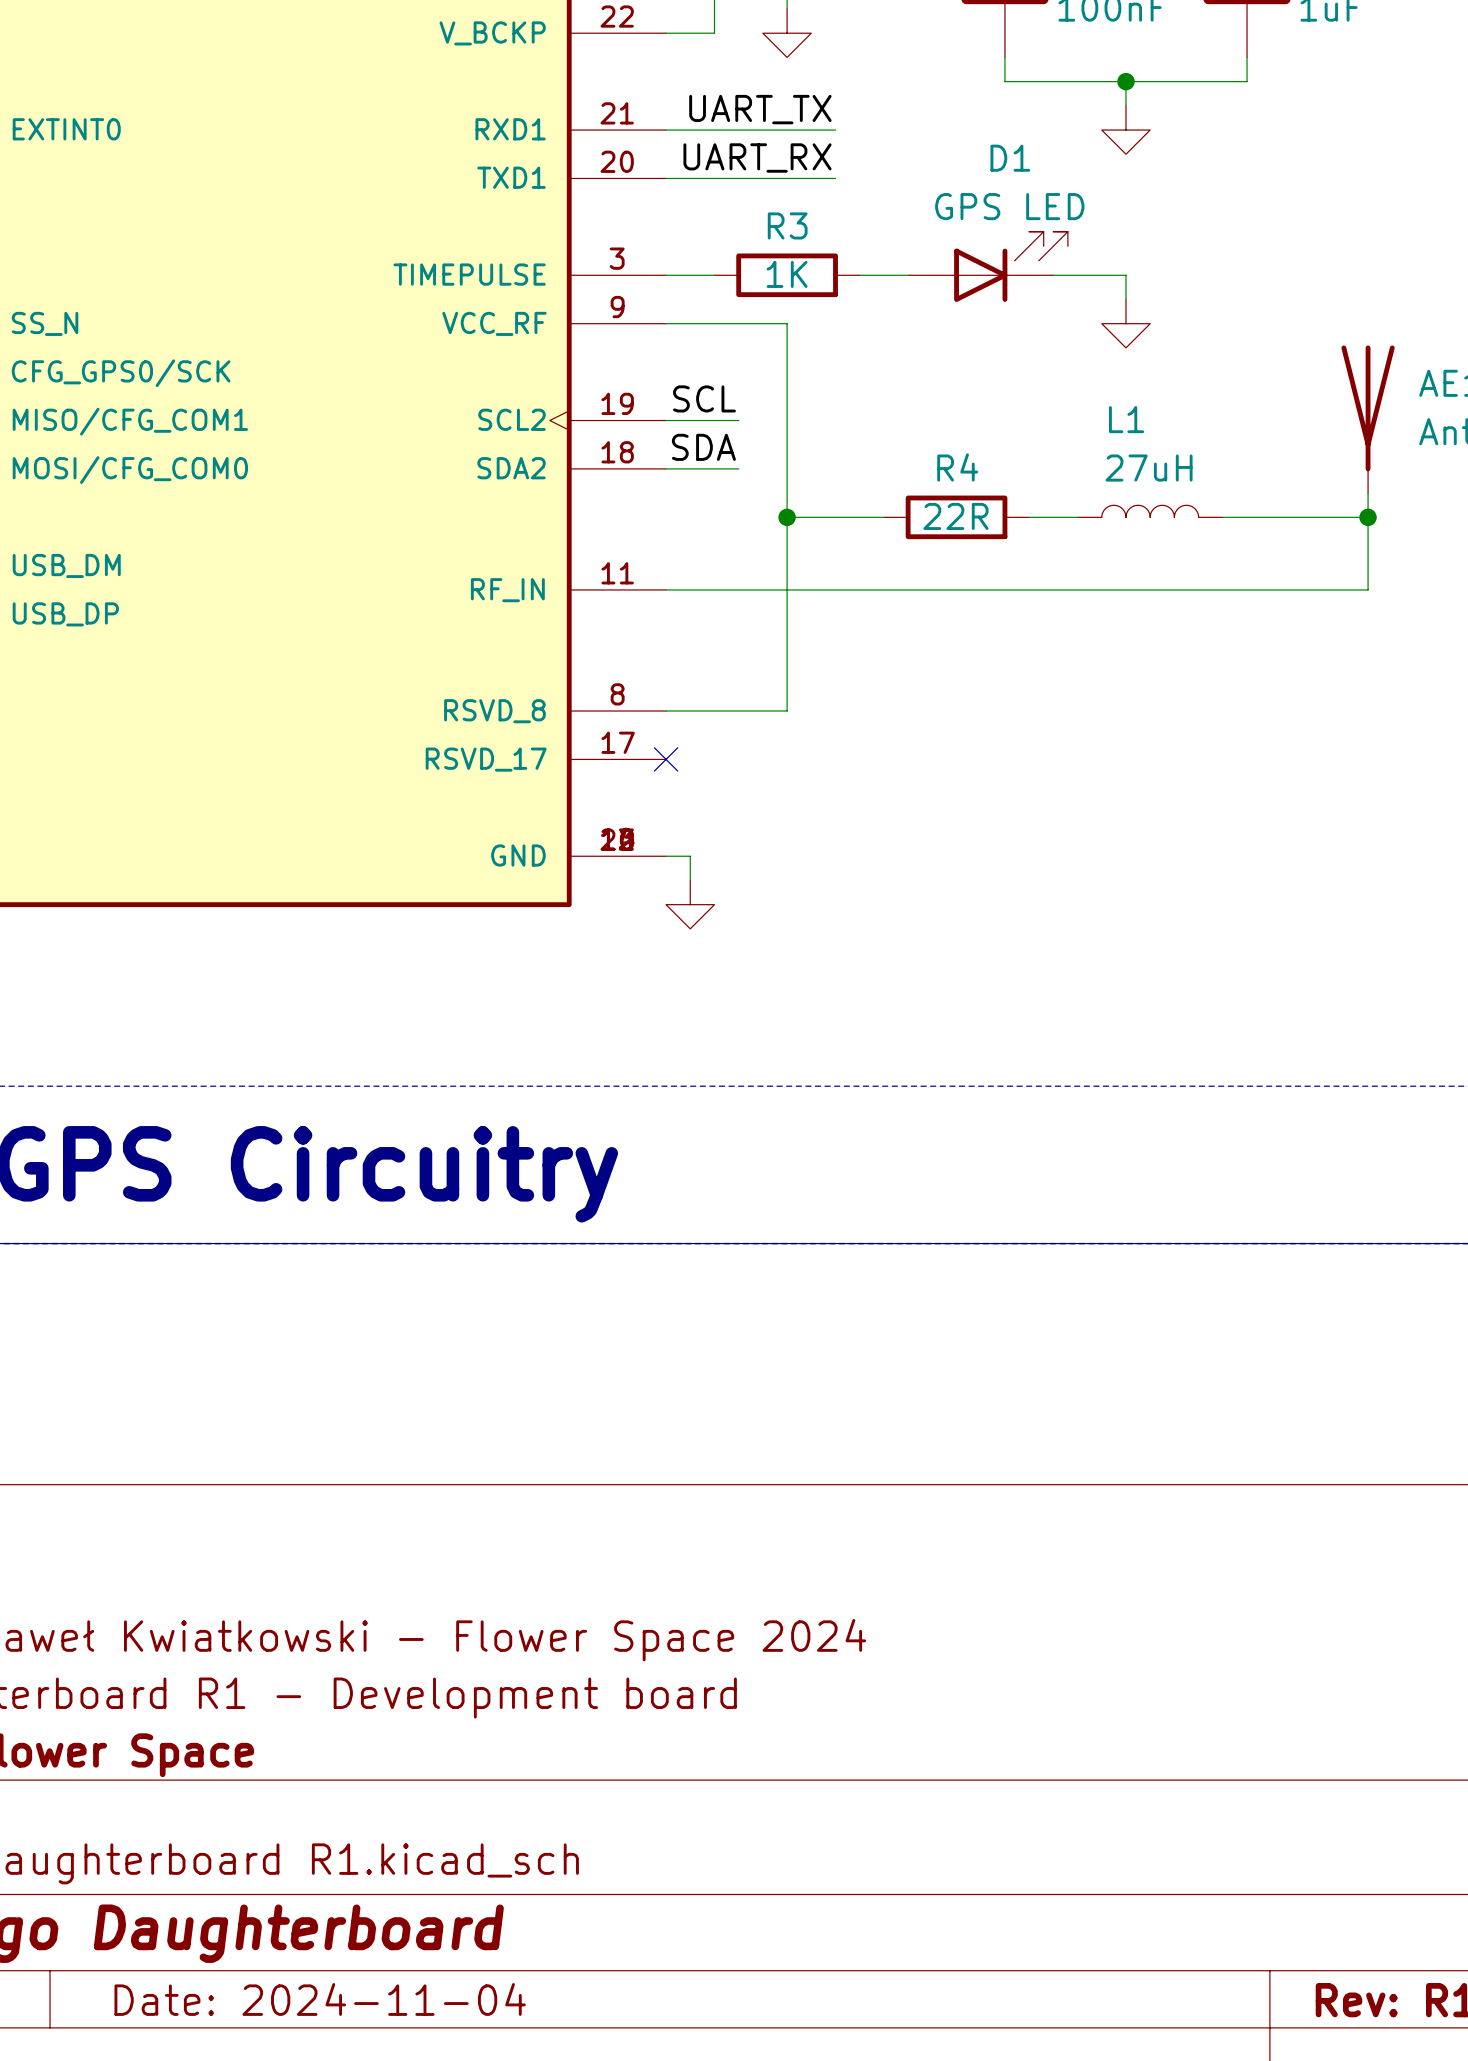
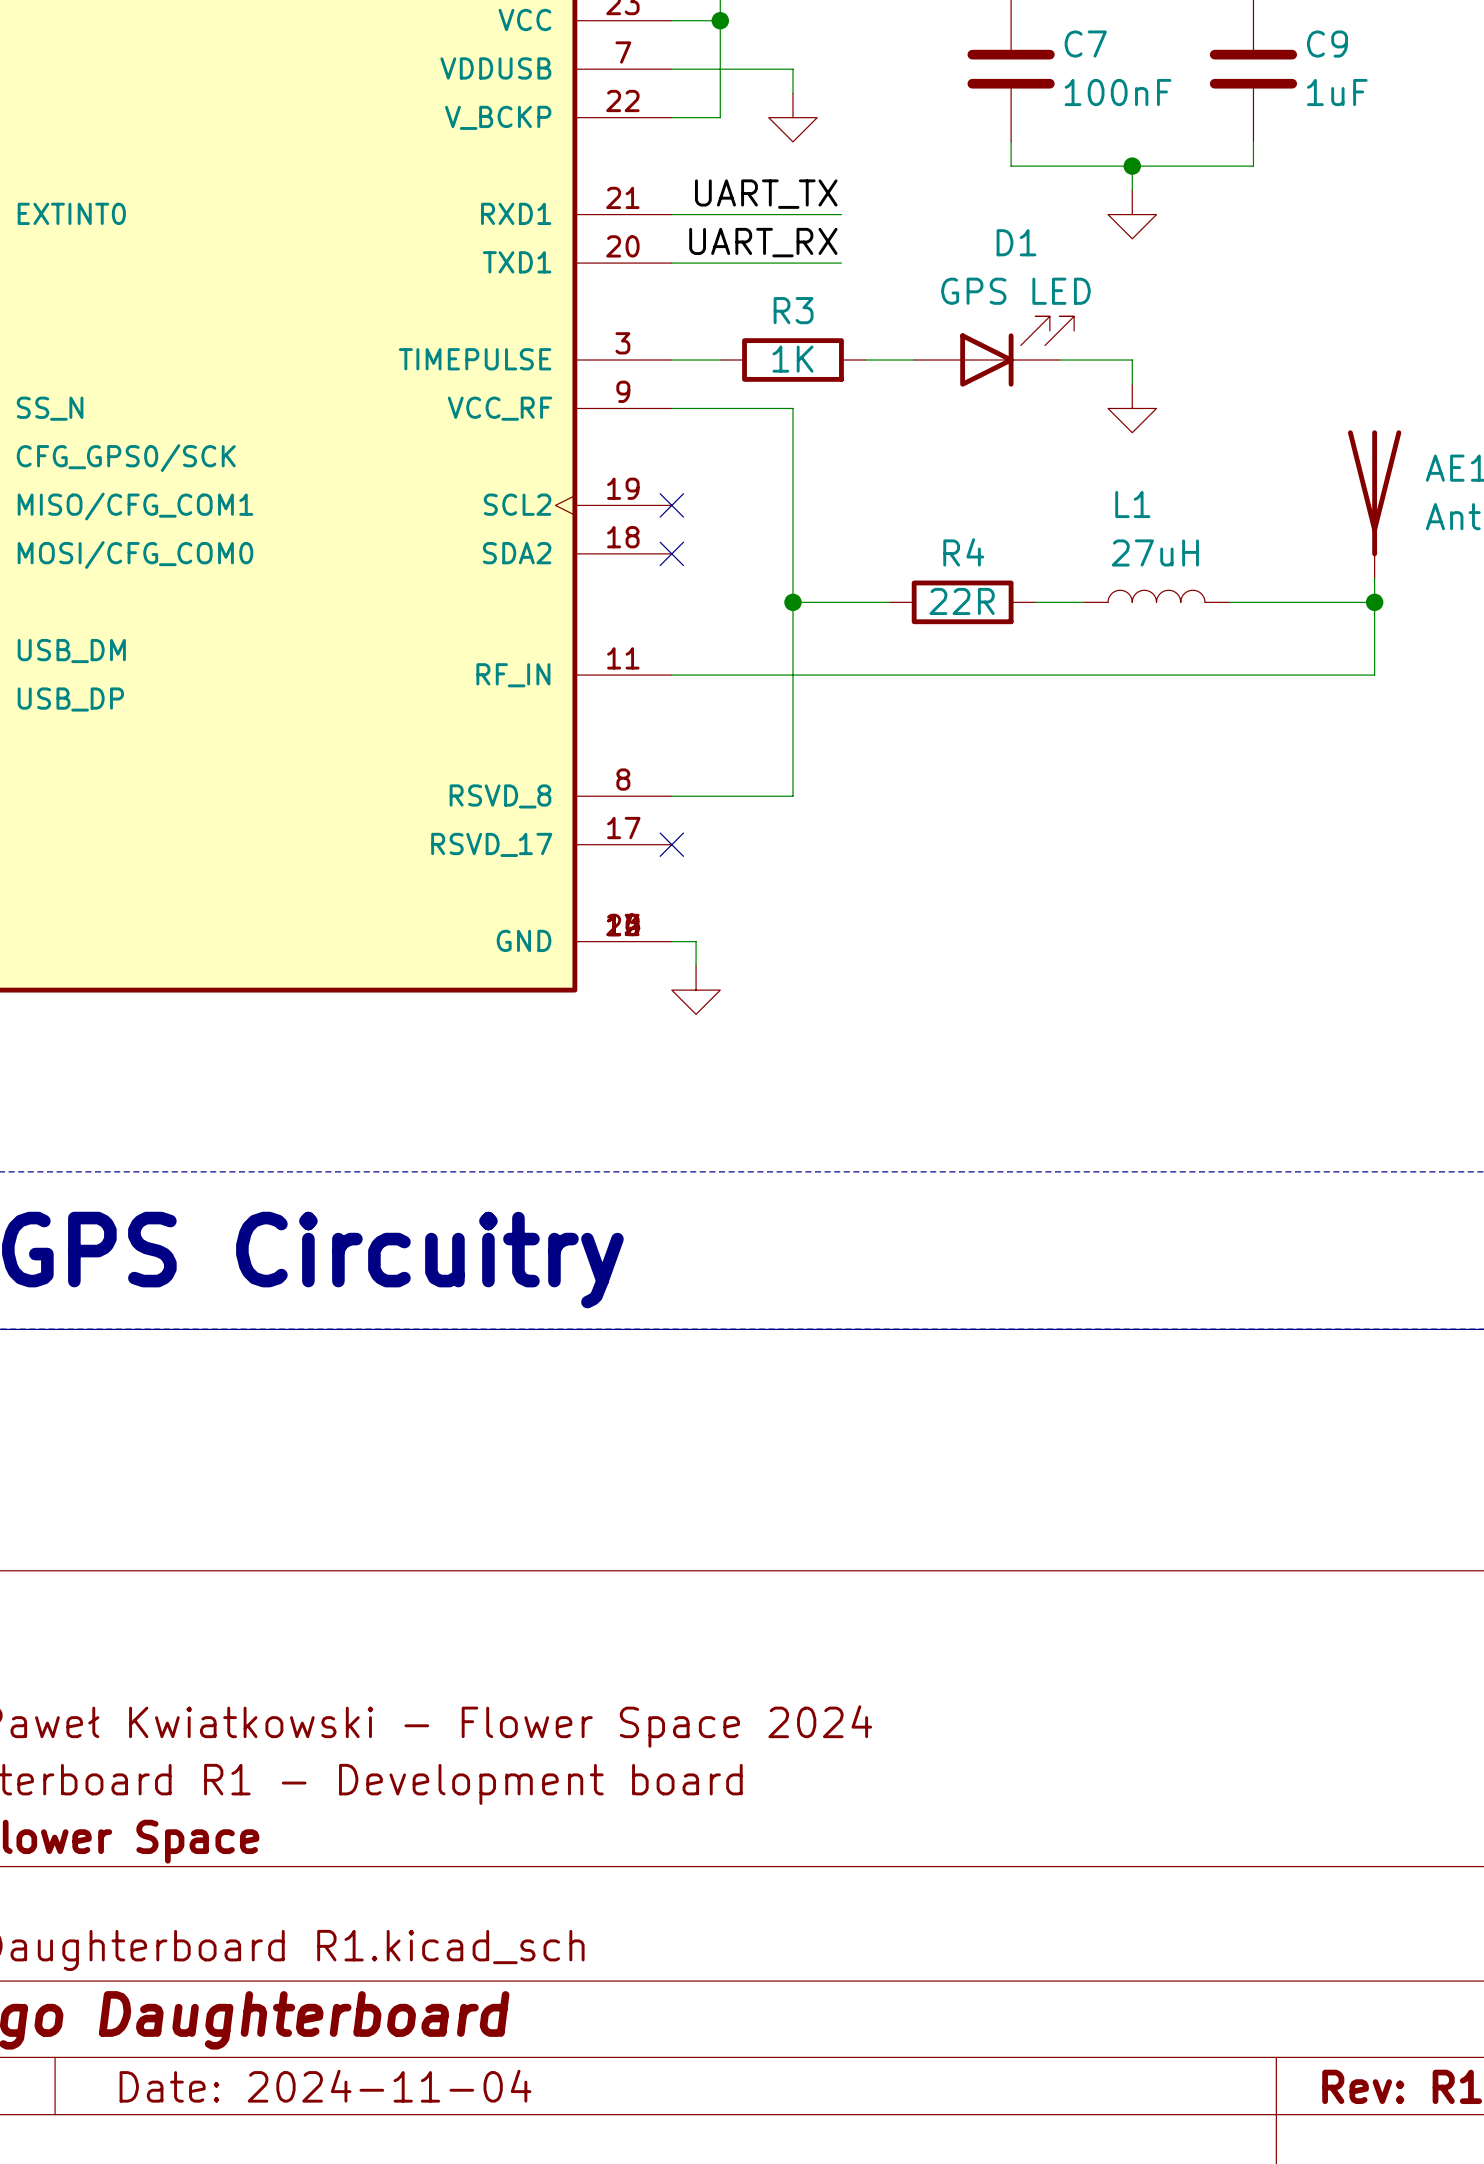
label: SCL (704, 398) -> none
wire: (666, 420) (738, 420) -> none
no-connect mark: none -> (671, 505)
label: SDA (703, 447) -> none
wire: (666, 468) (738, 468) -> none
no-connect mark: none -> (671, 553)

